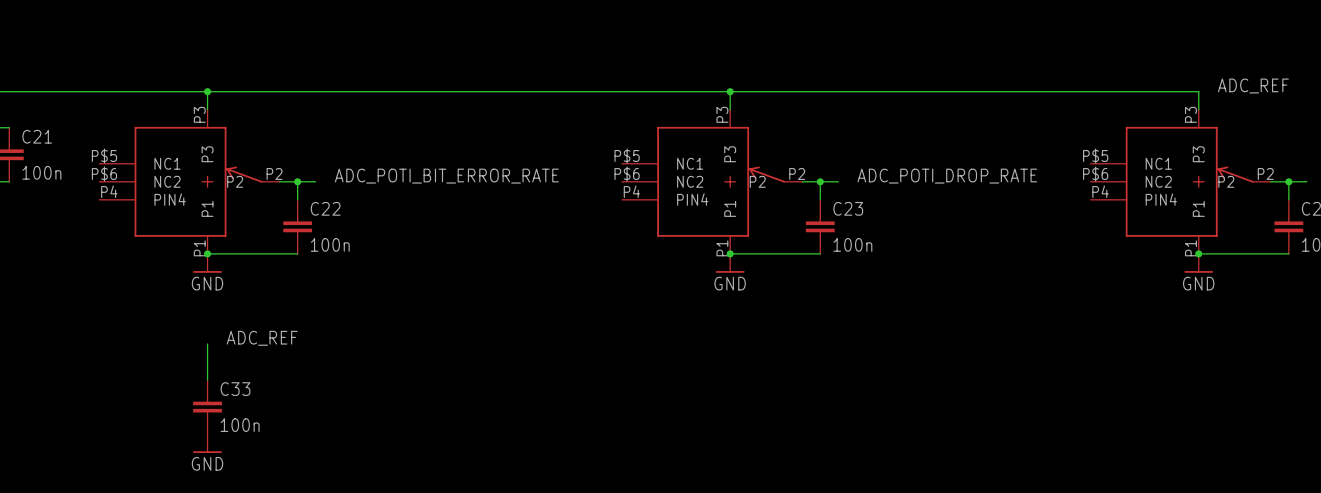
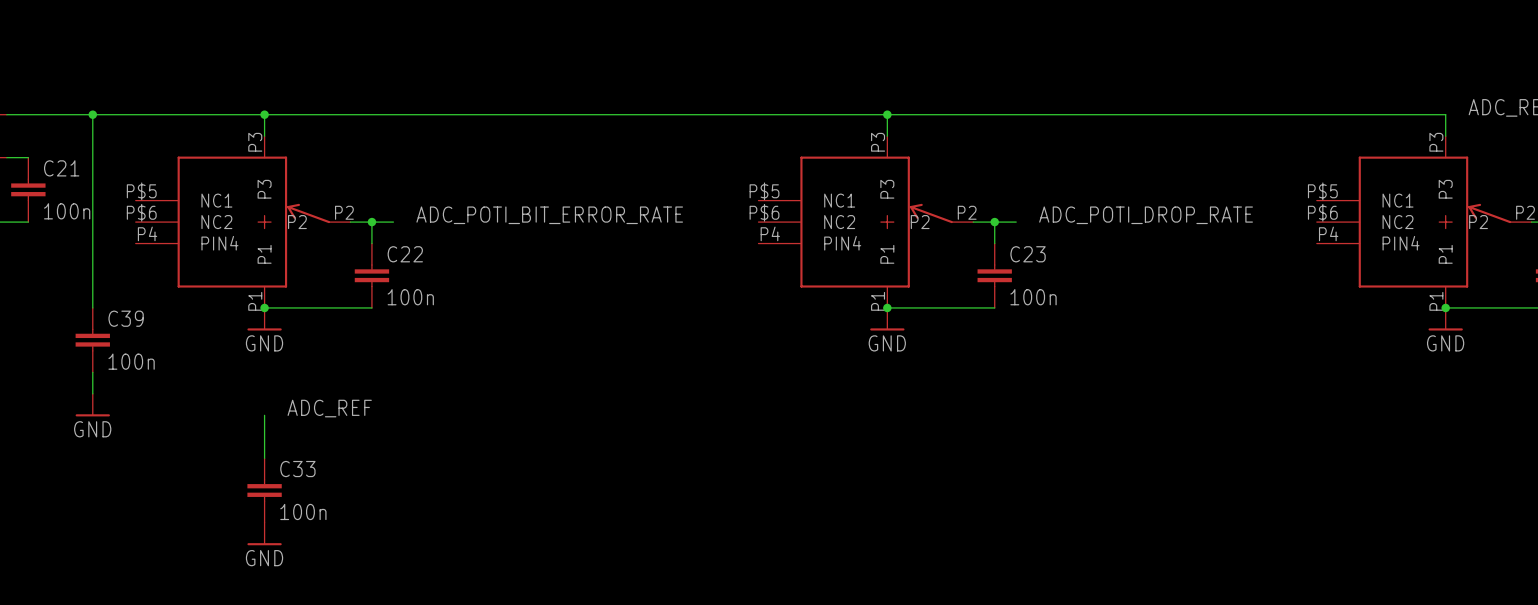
wire: none -> (92, 114) (92, 307)
junction: none -> (92, 114)
C39: none -> 100n (92, 340)
wire: none -> (92, 372) (92, 393)
power symbol: none -> GND (92, 405)

